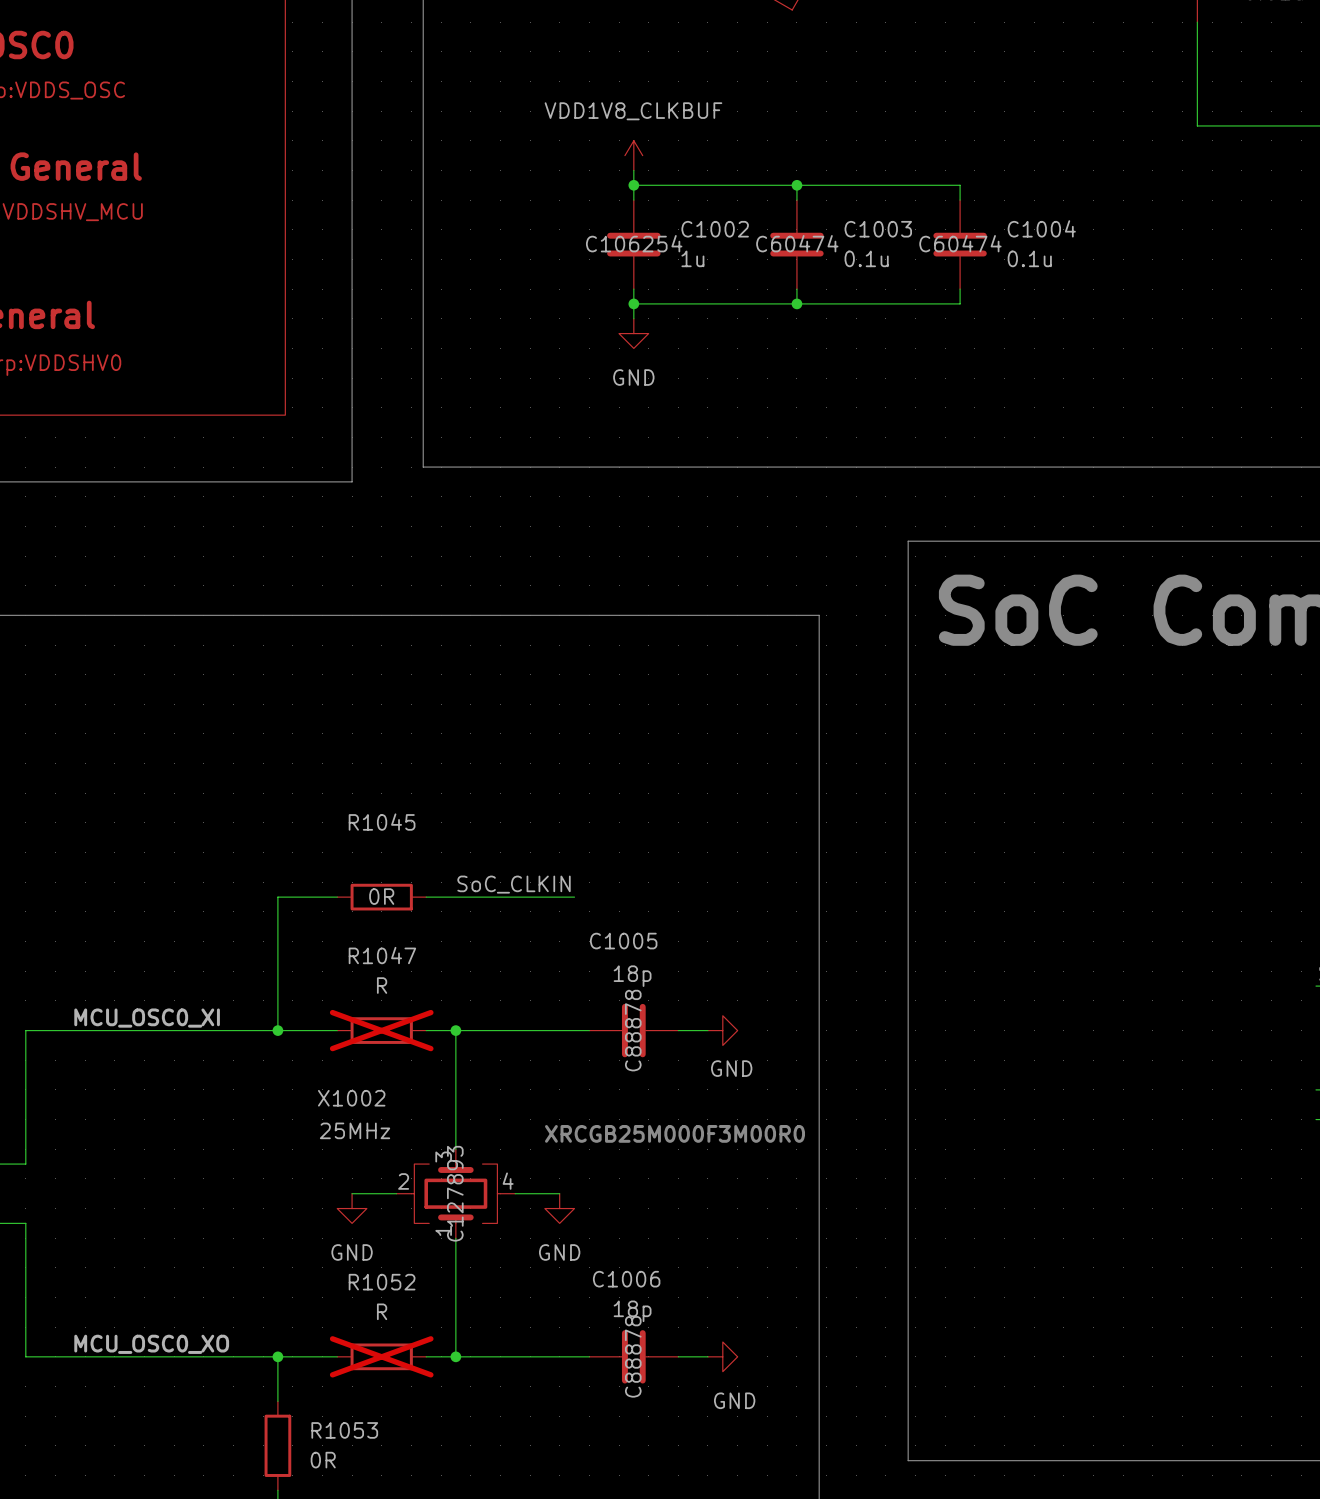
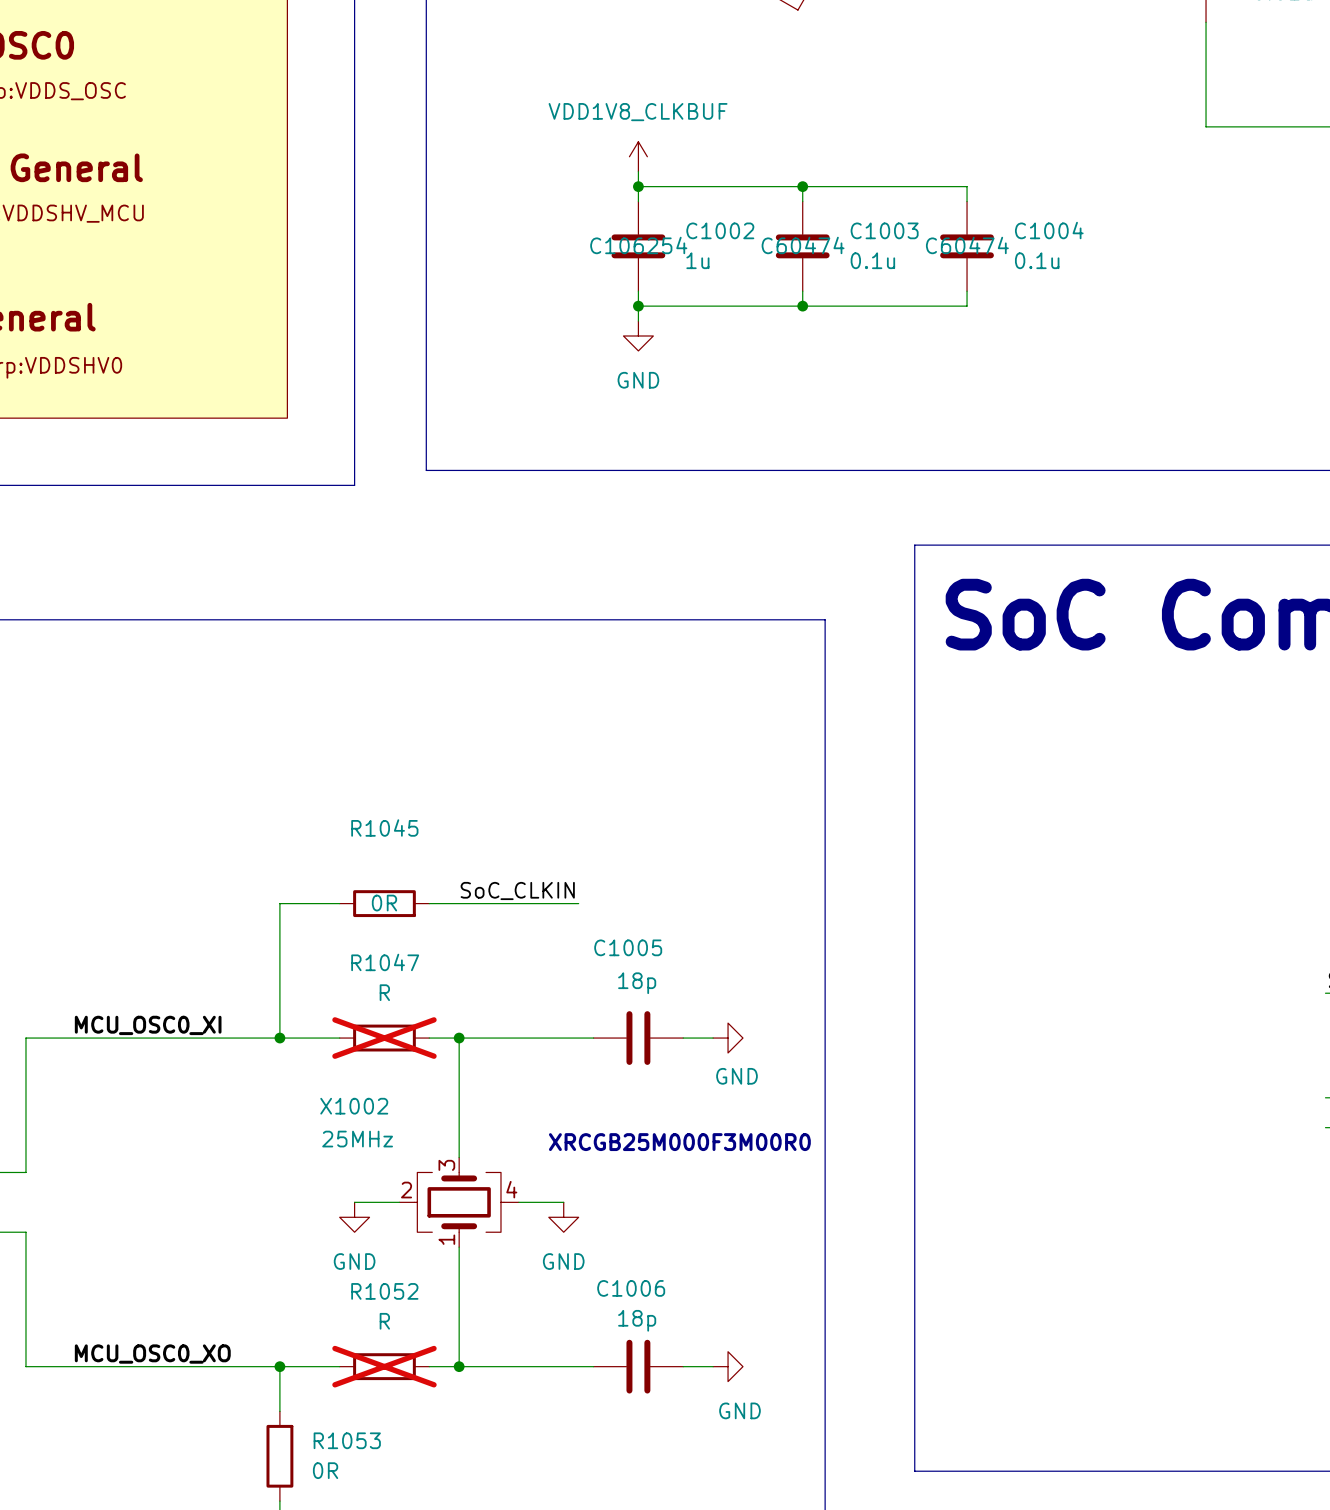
C1005 text: C88878 (633, 1030) -> none
X1002 text: C127893 (455, 1193) -> none
C1006 text: C88878 (633, 1356) -> none

